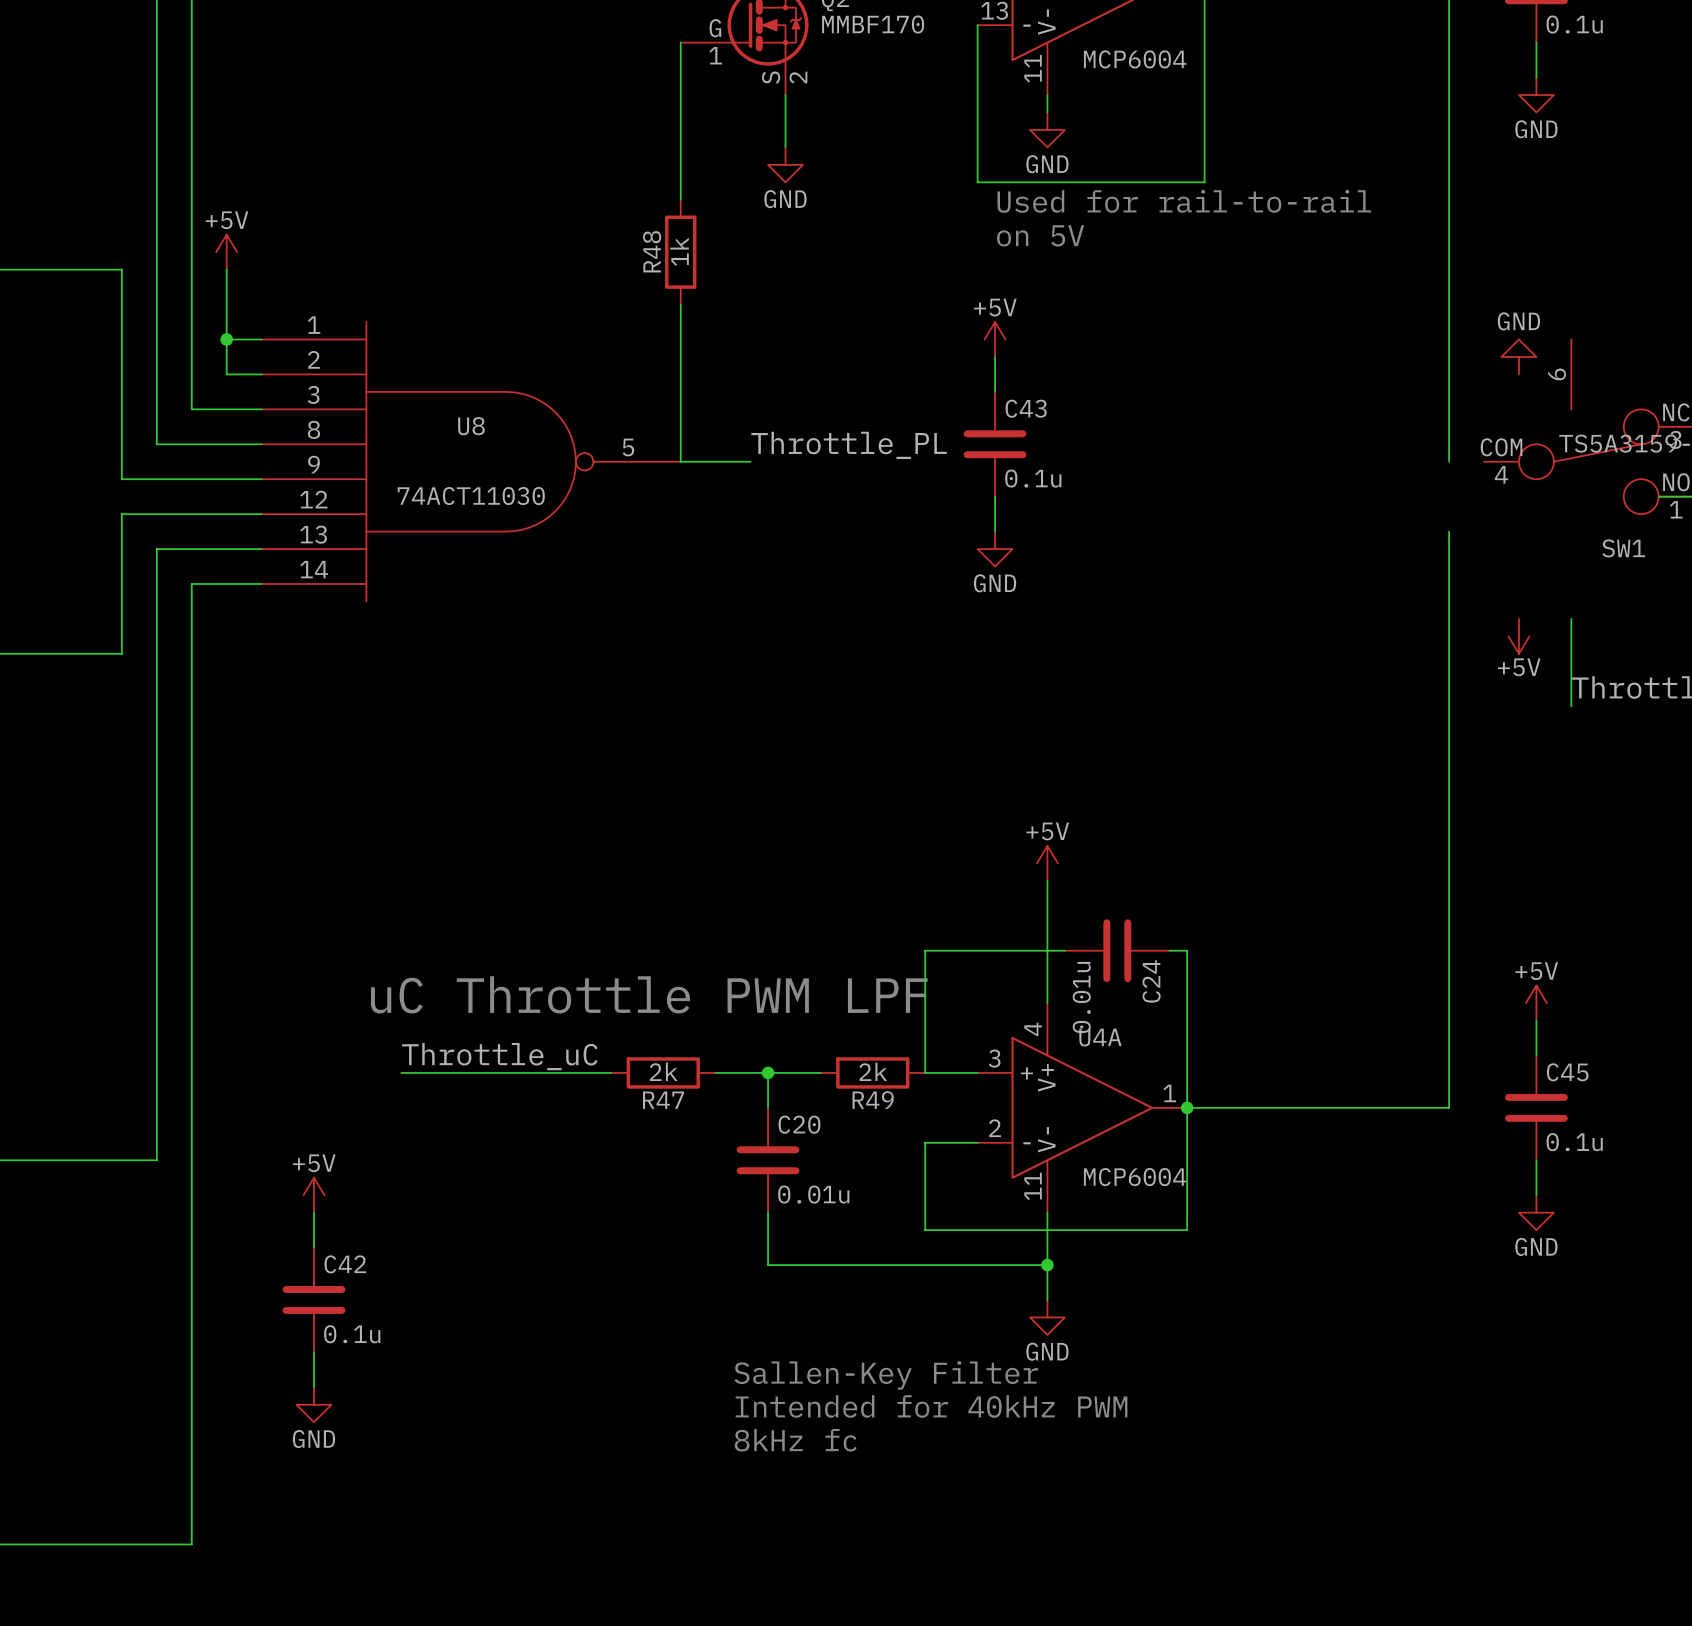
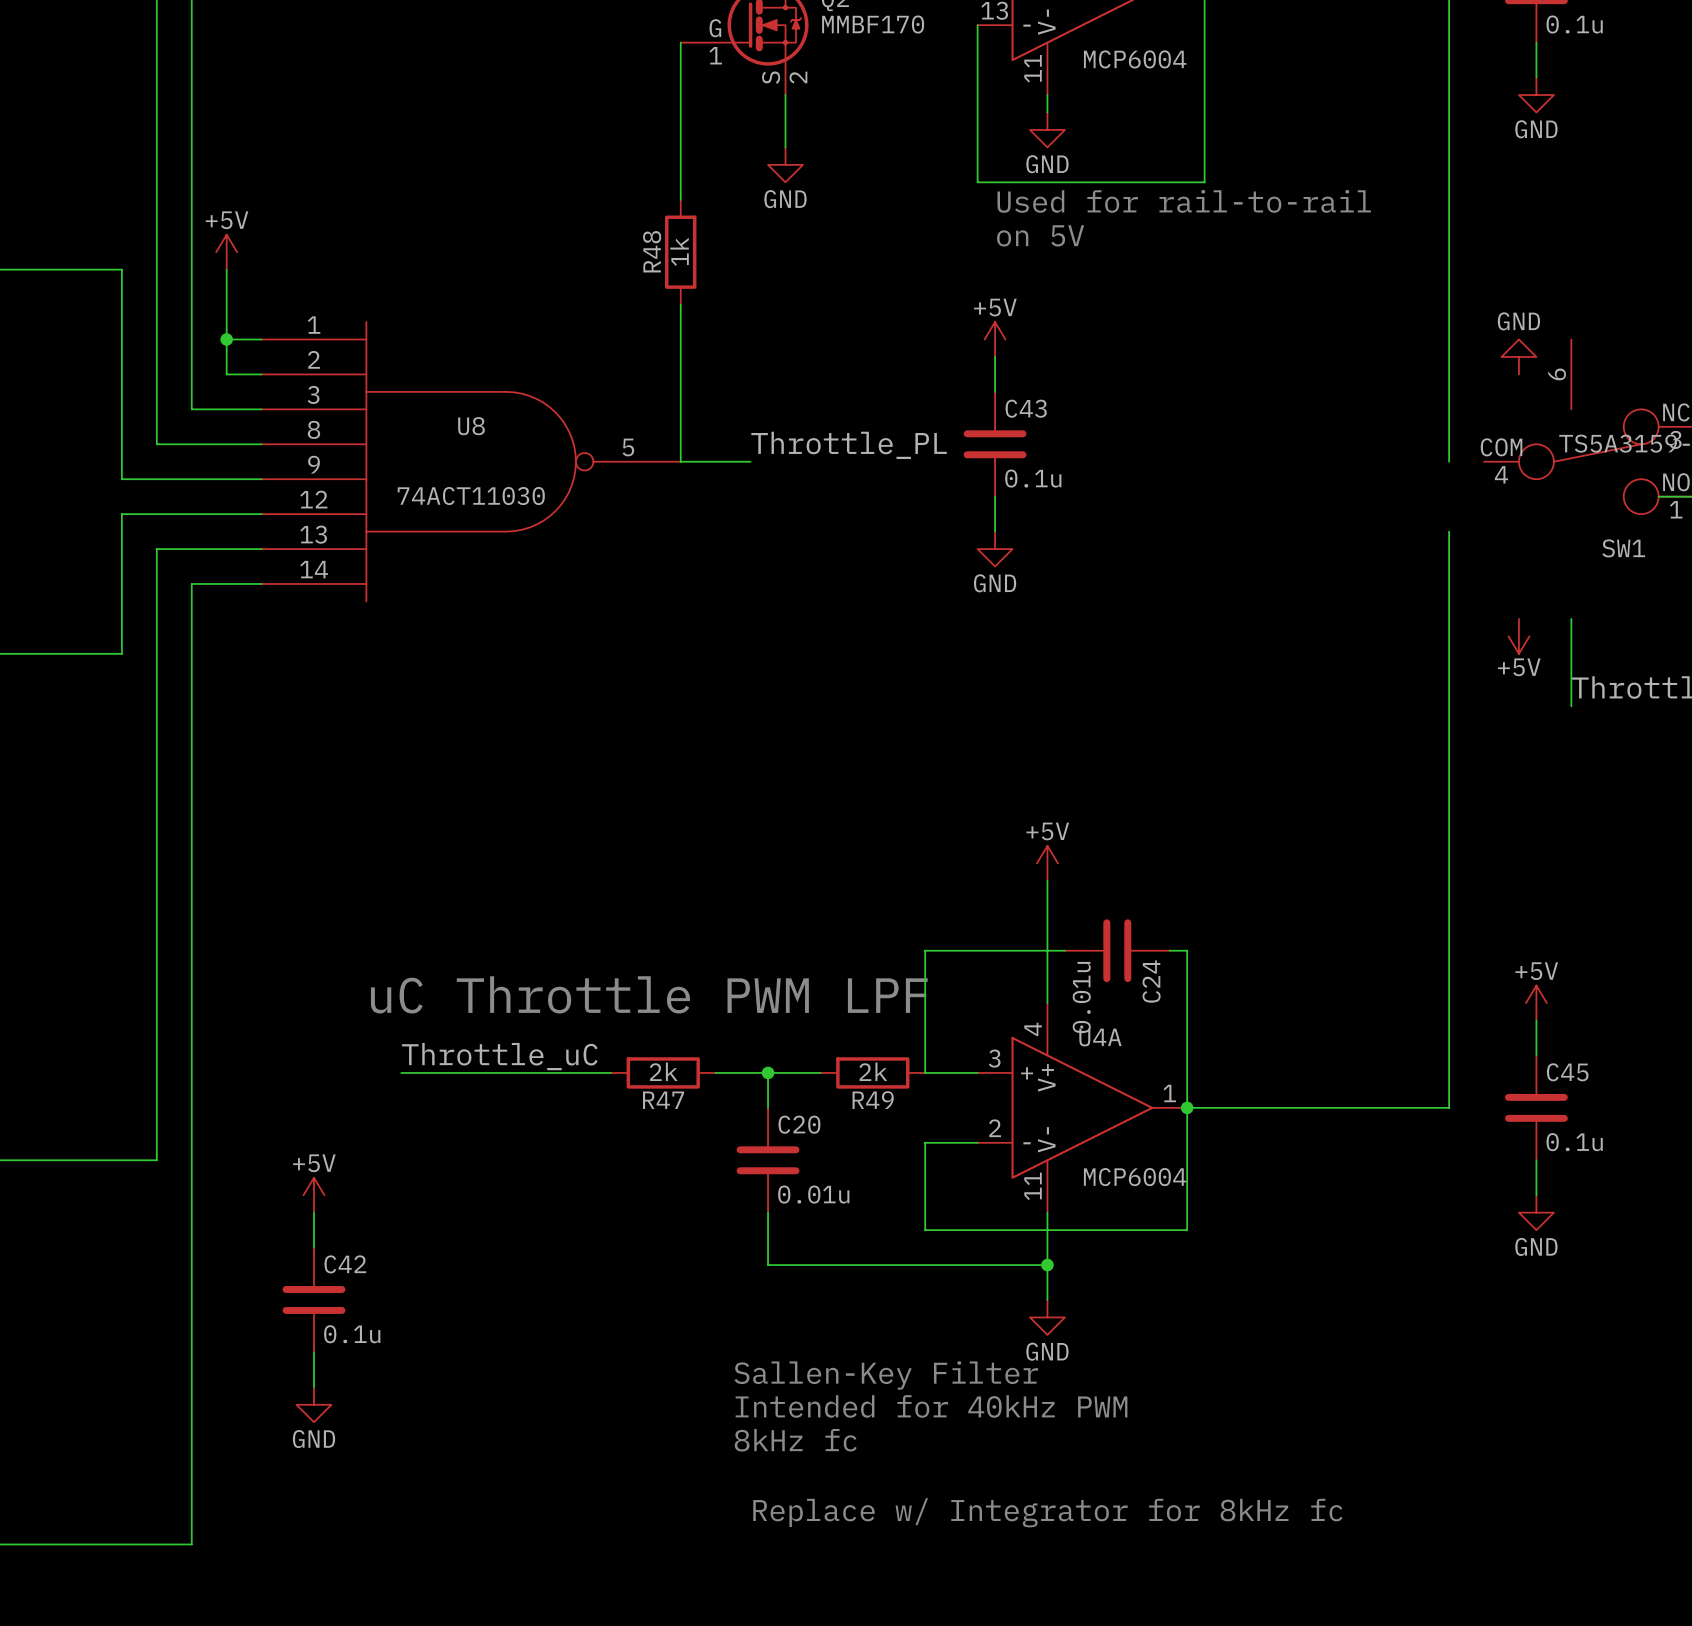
text: none -> Replace w/ Integrator for 8kHz fc (1047, 1512)

